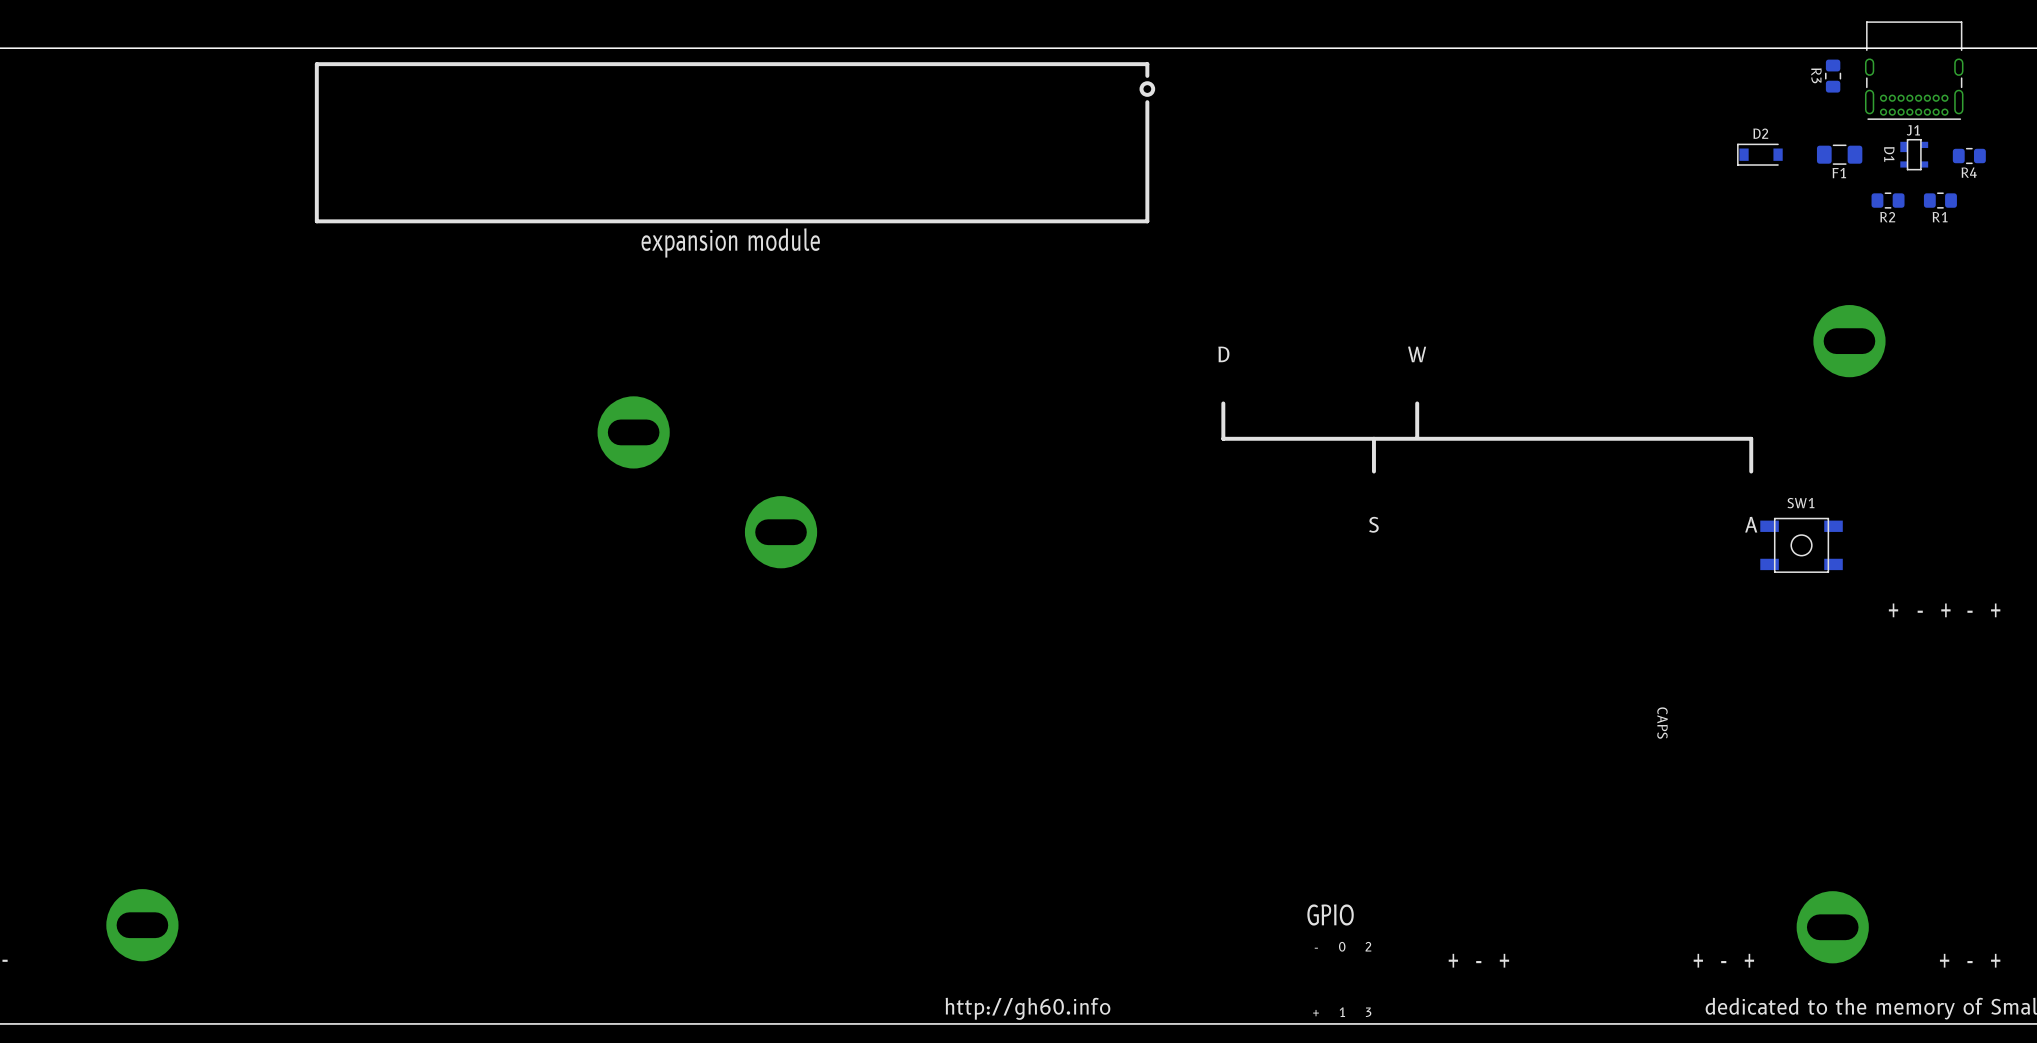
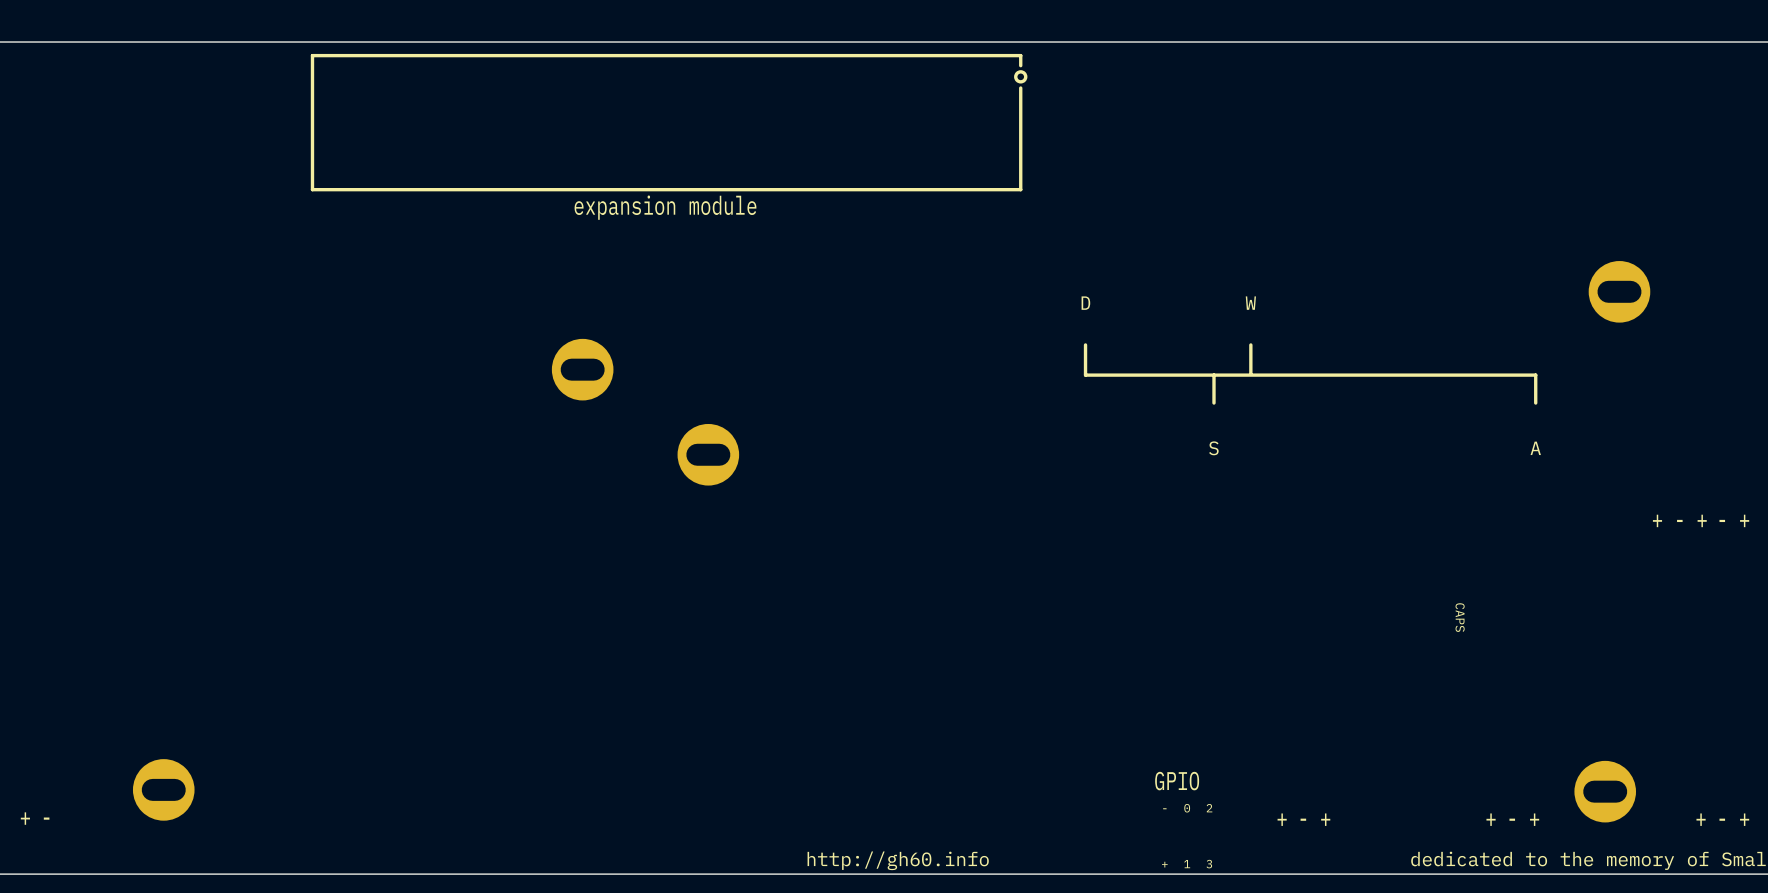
J1: (1914, 70) -> none
R3: (1833, 76) -> none
D2: (1759, 154) -> none
F1: (1839, 154) -> none
D1: (1914, 154) -> none
R4: (1969, 156) -> none
R2: (1888, 200) -> none
R1: (1940, 200) -> none
SW1: (1801, 545) -> none

